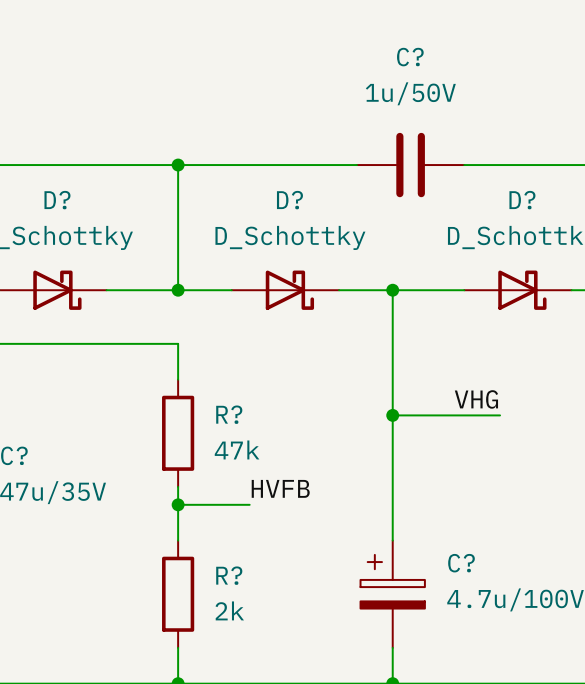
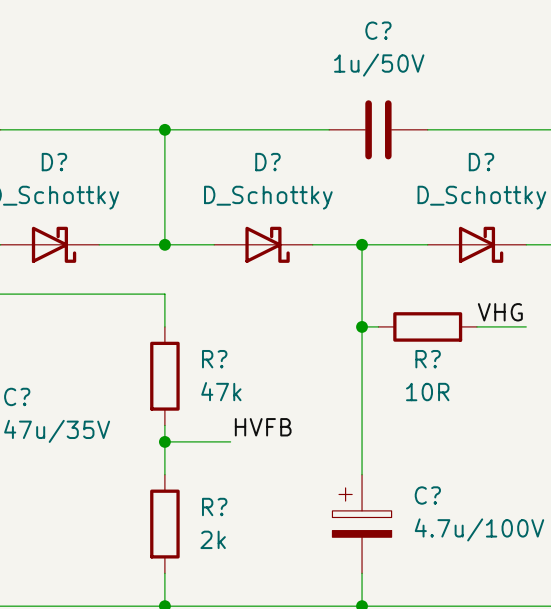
wire: none -> (362, 326) (378, 326)
R?: none -> 10R (427, 326)
wire: none -> (476, 326) (526, 326)
label position: VHG (476, 399) -> VHG (500, 312)
wire: (392, 415) (500, 415) -> none
junction position: (392, 415) -> (362, 326)

